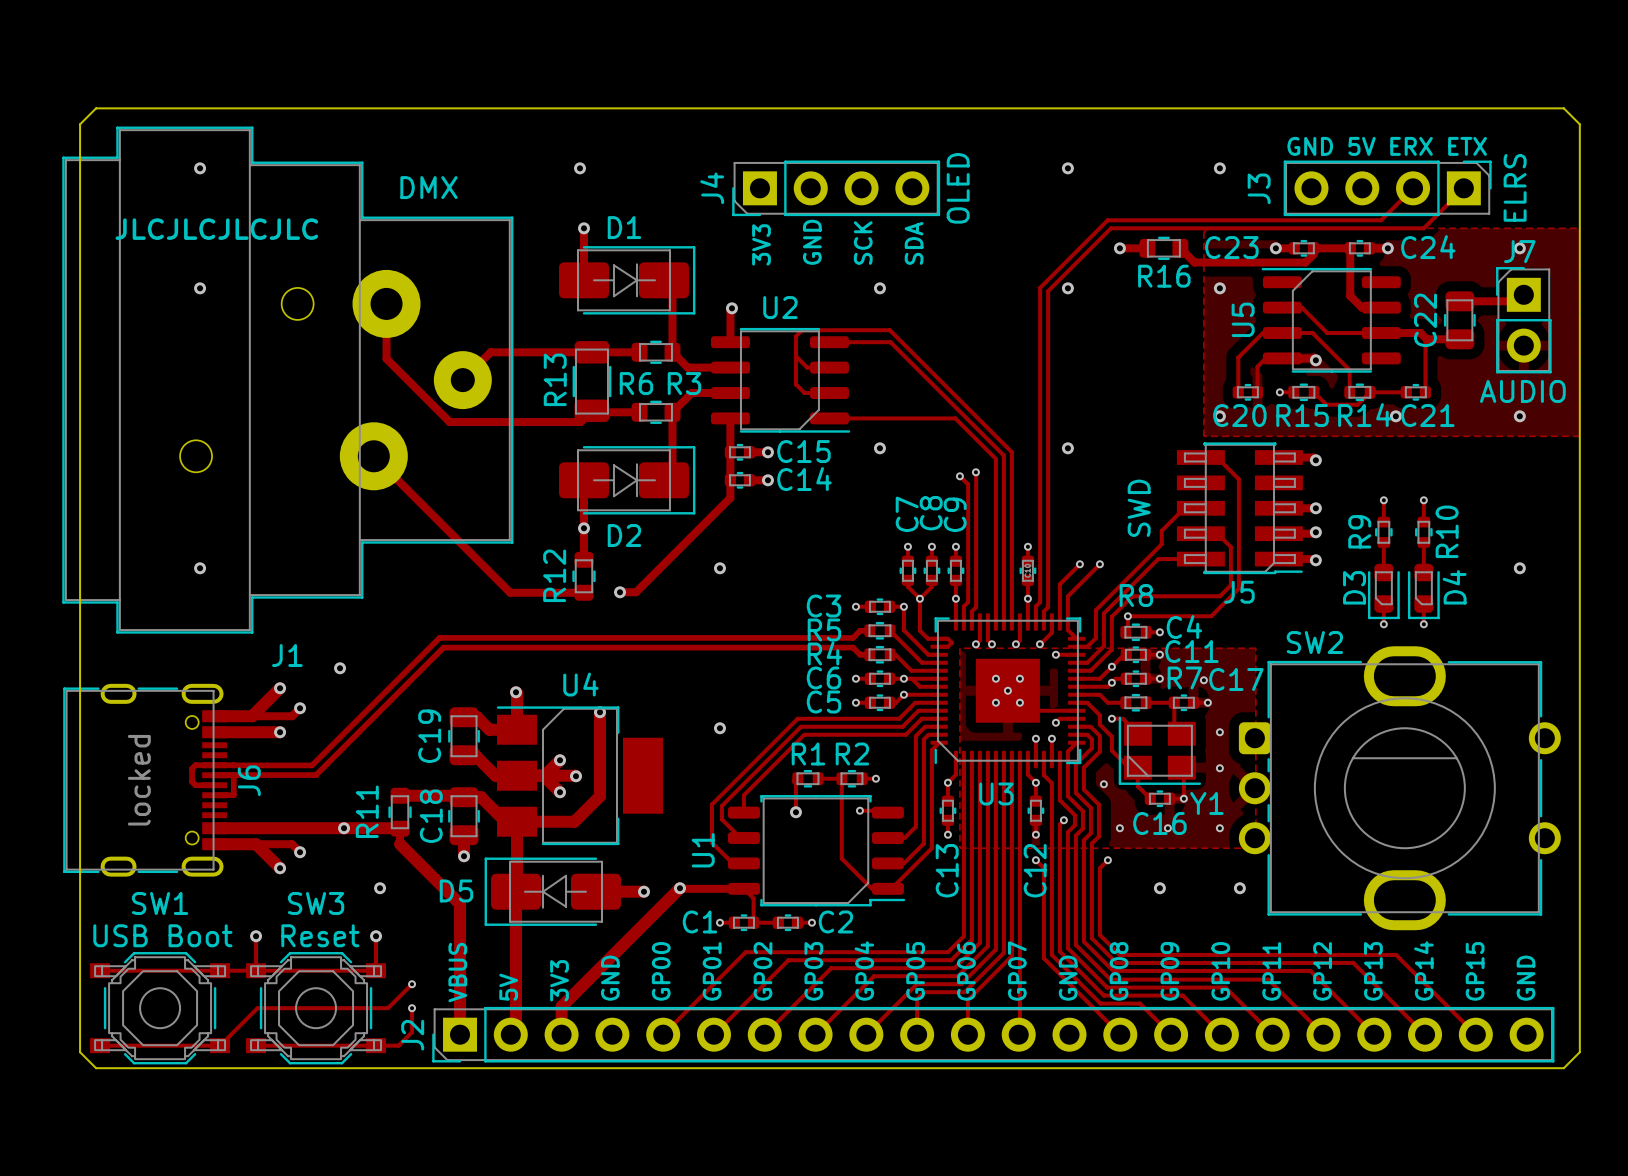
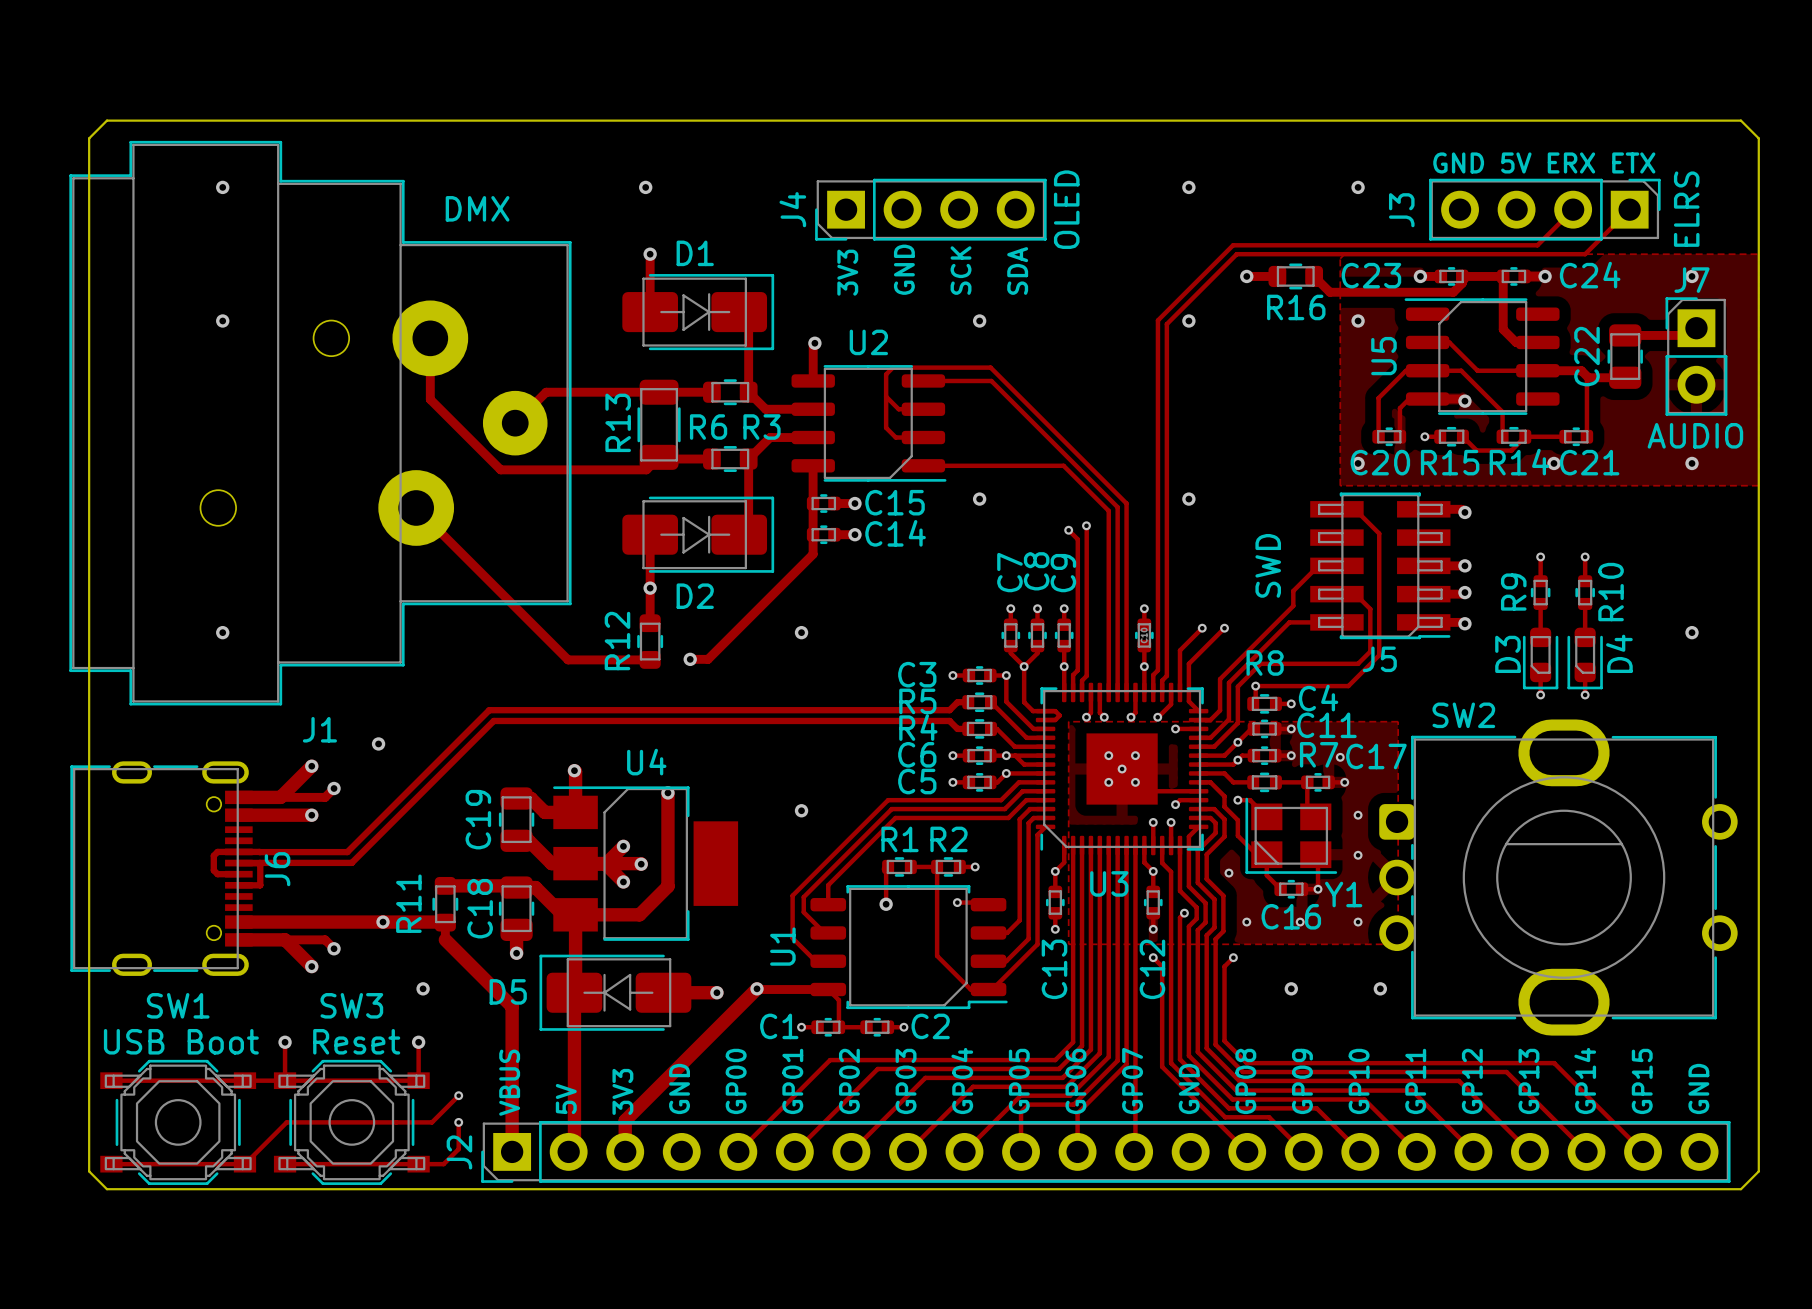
text: JLCJLCJLCJLC (216, 229) -> none
J6 text: locked (139, 780) -> none

